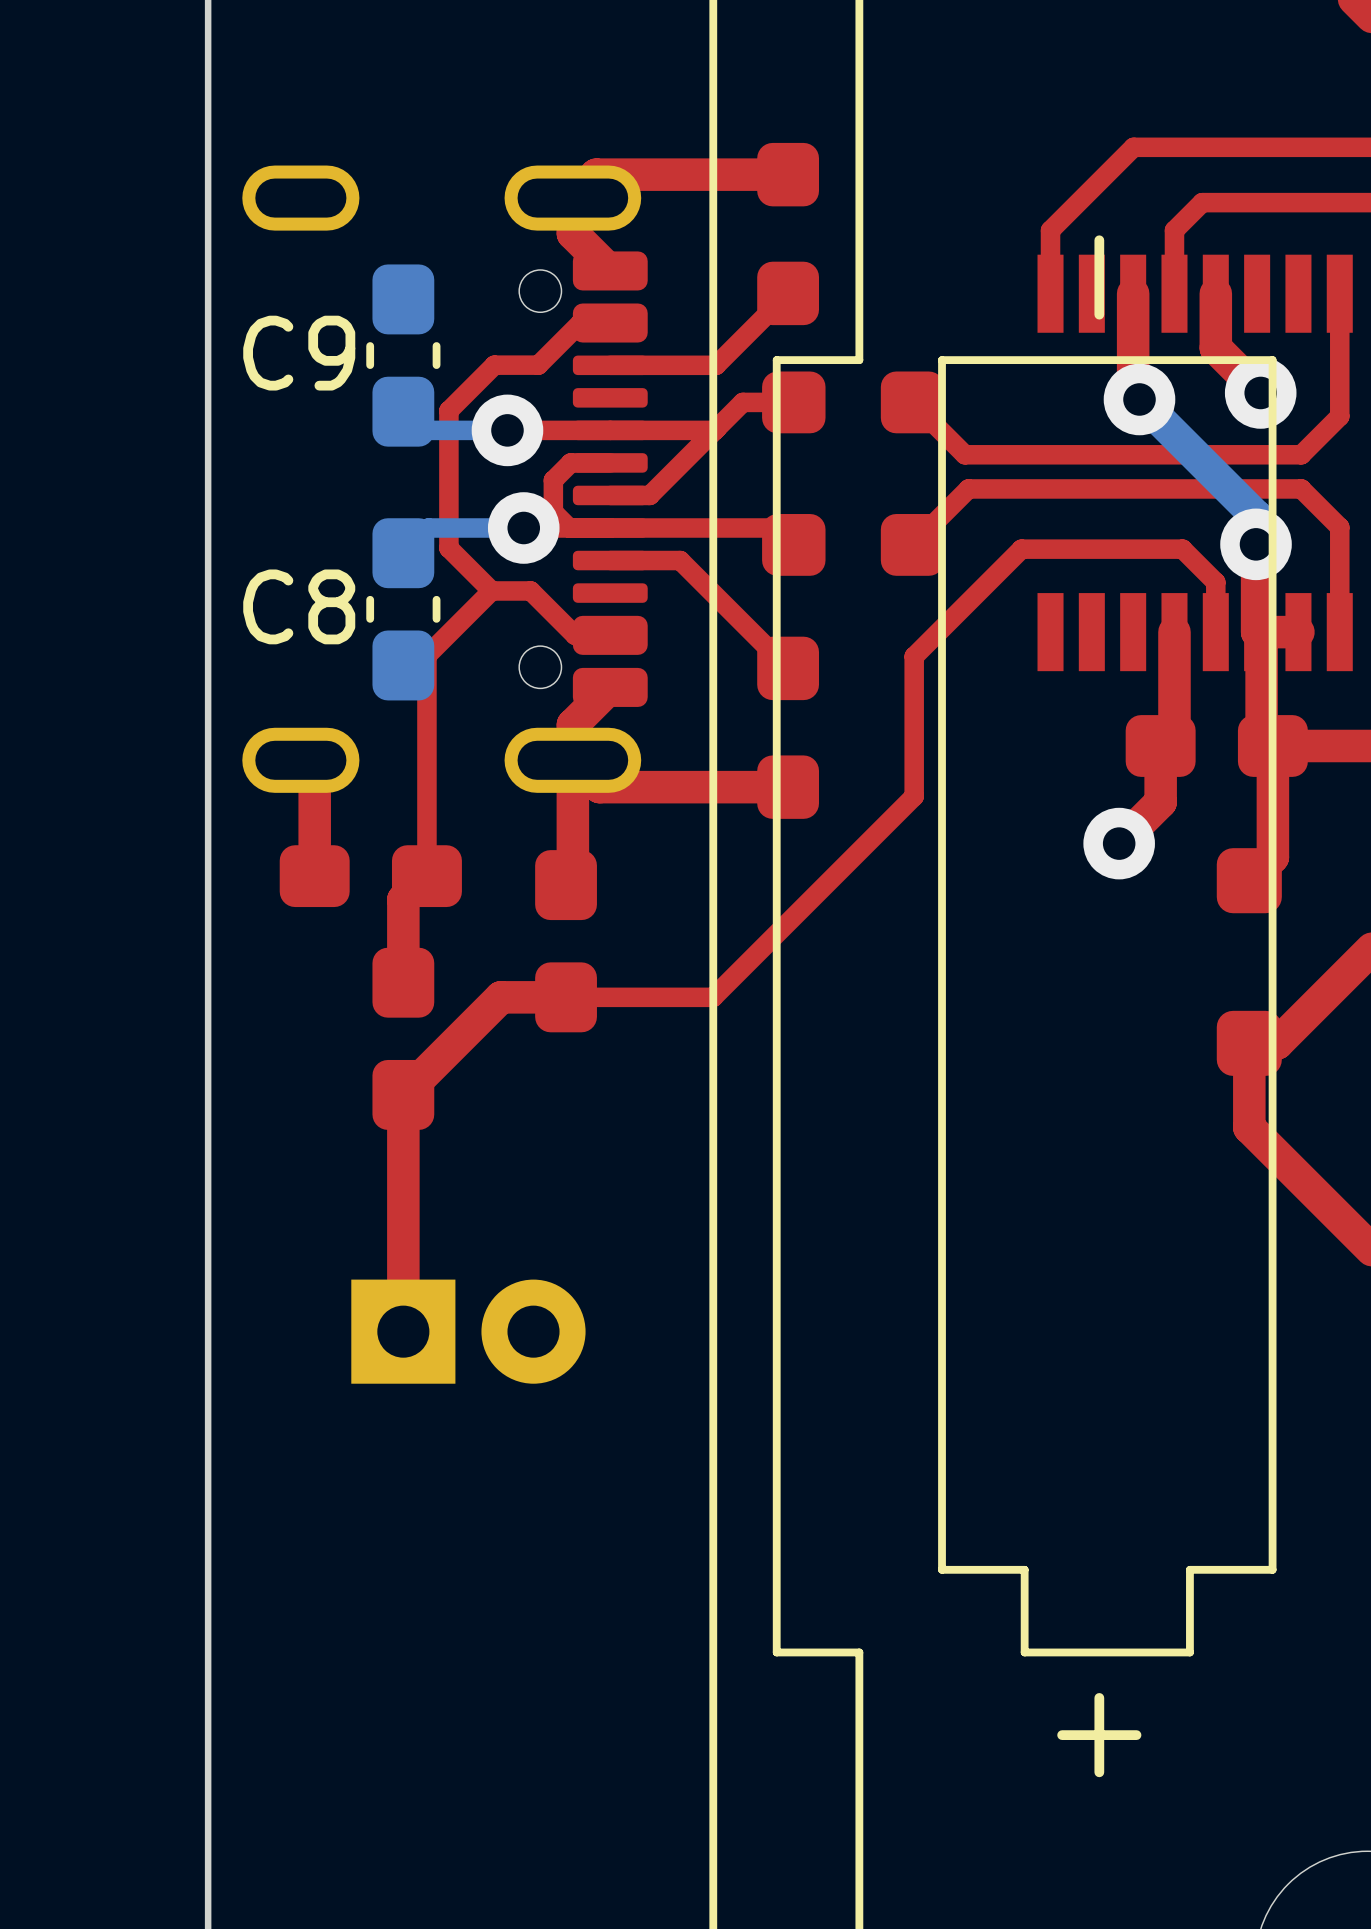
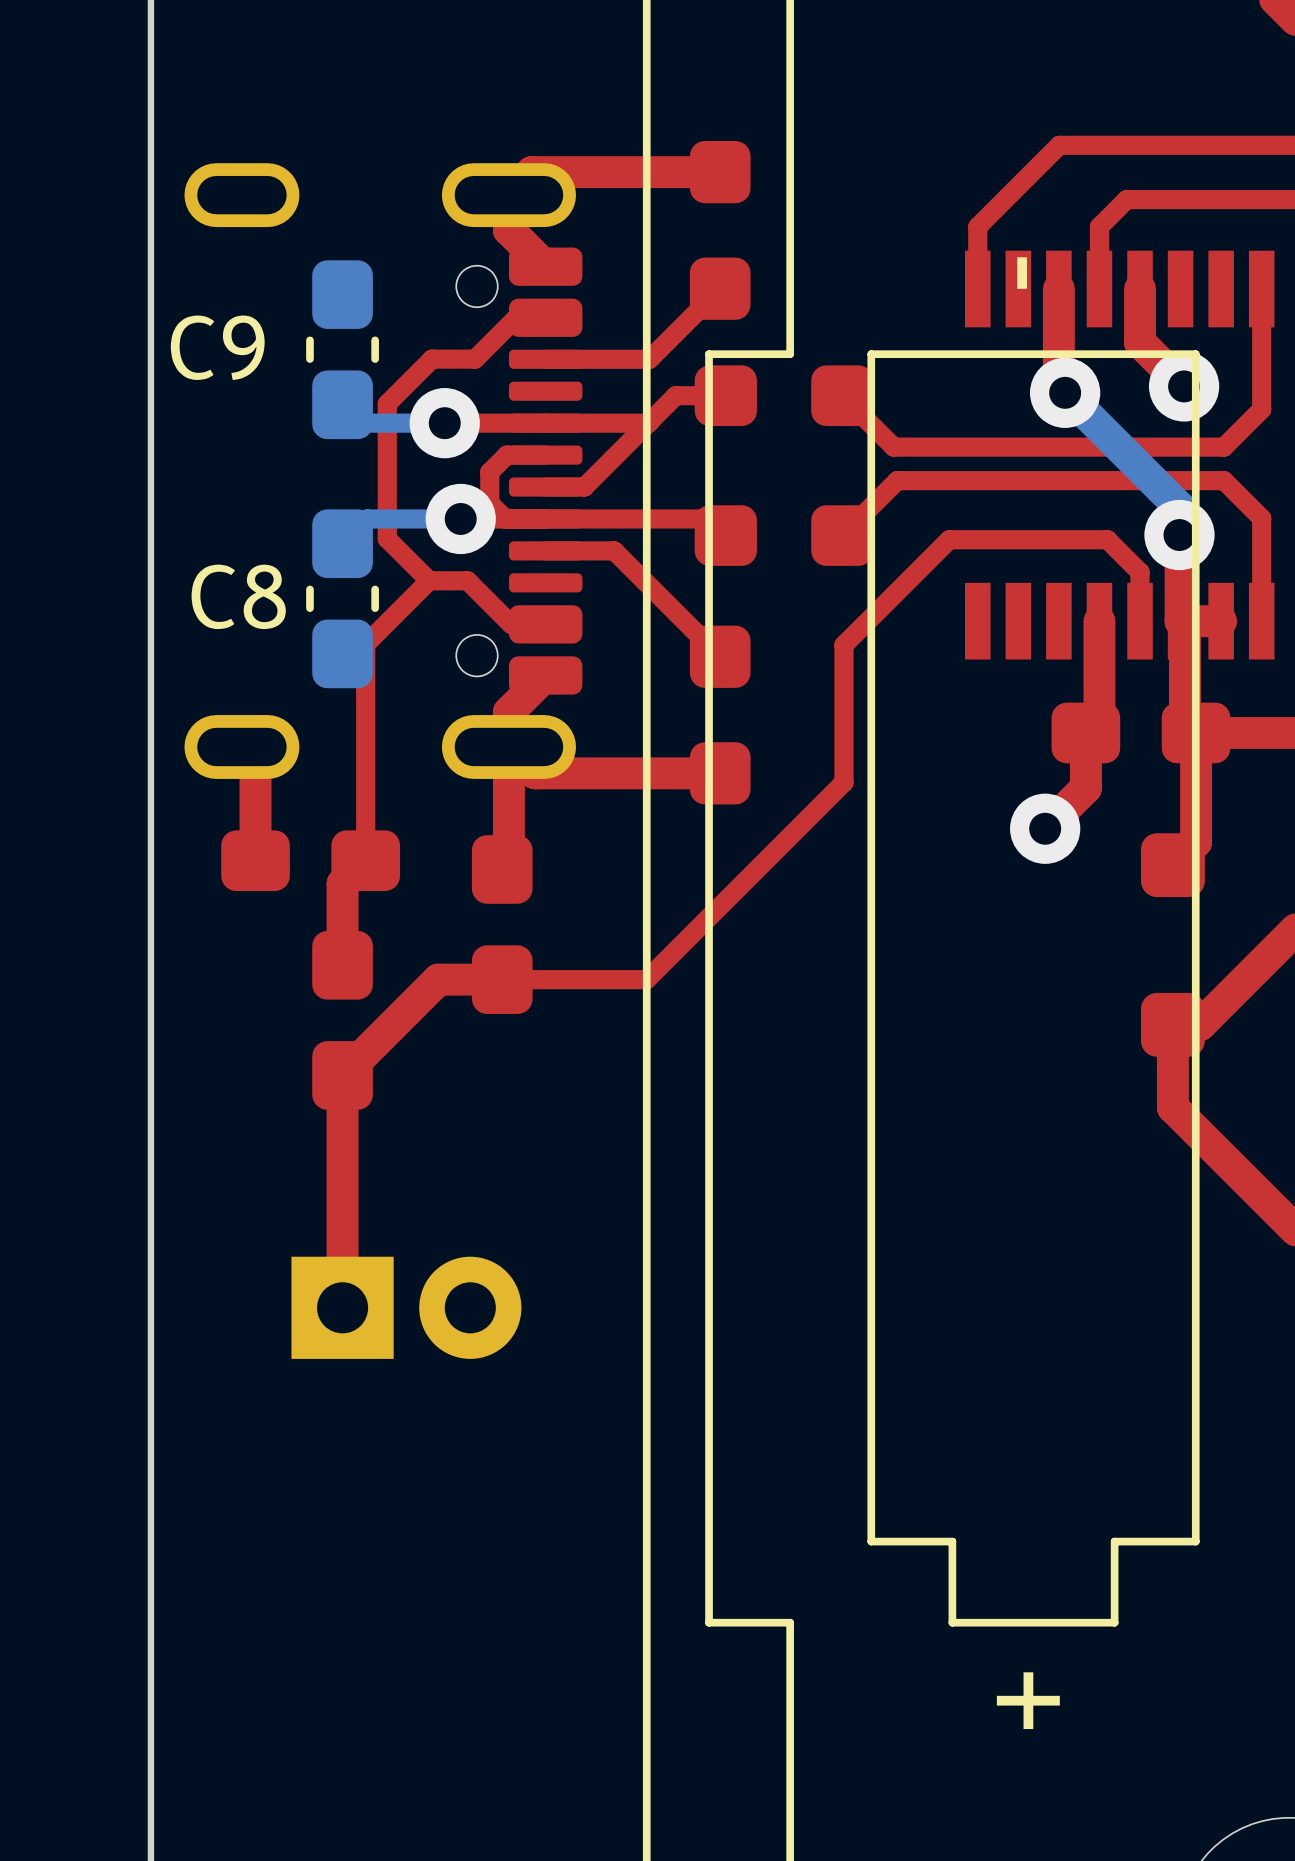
C9 name position: C9 (299, 353) -> C9 (217, 347)

